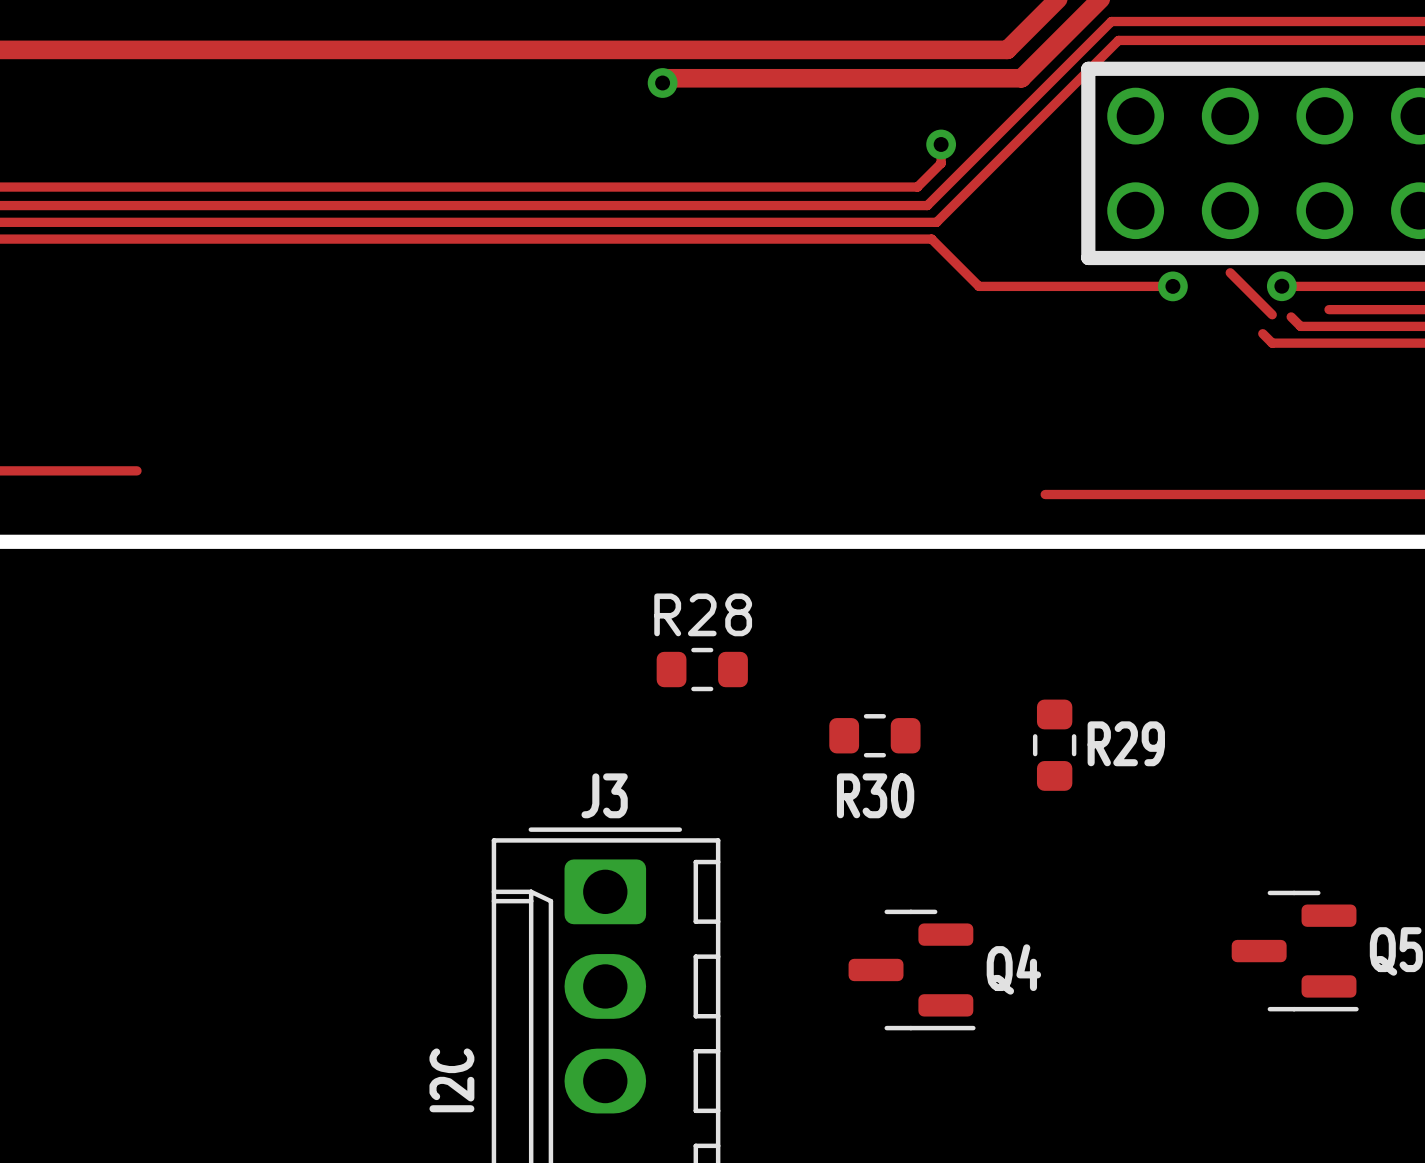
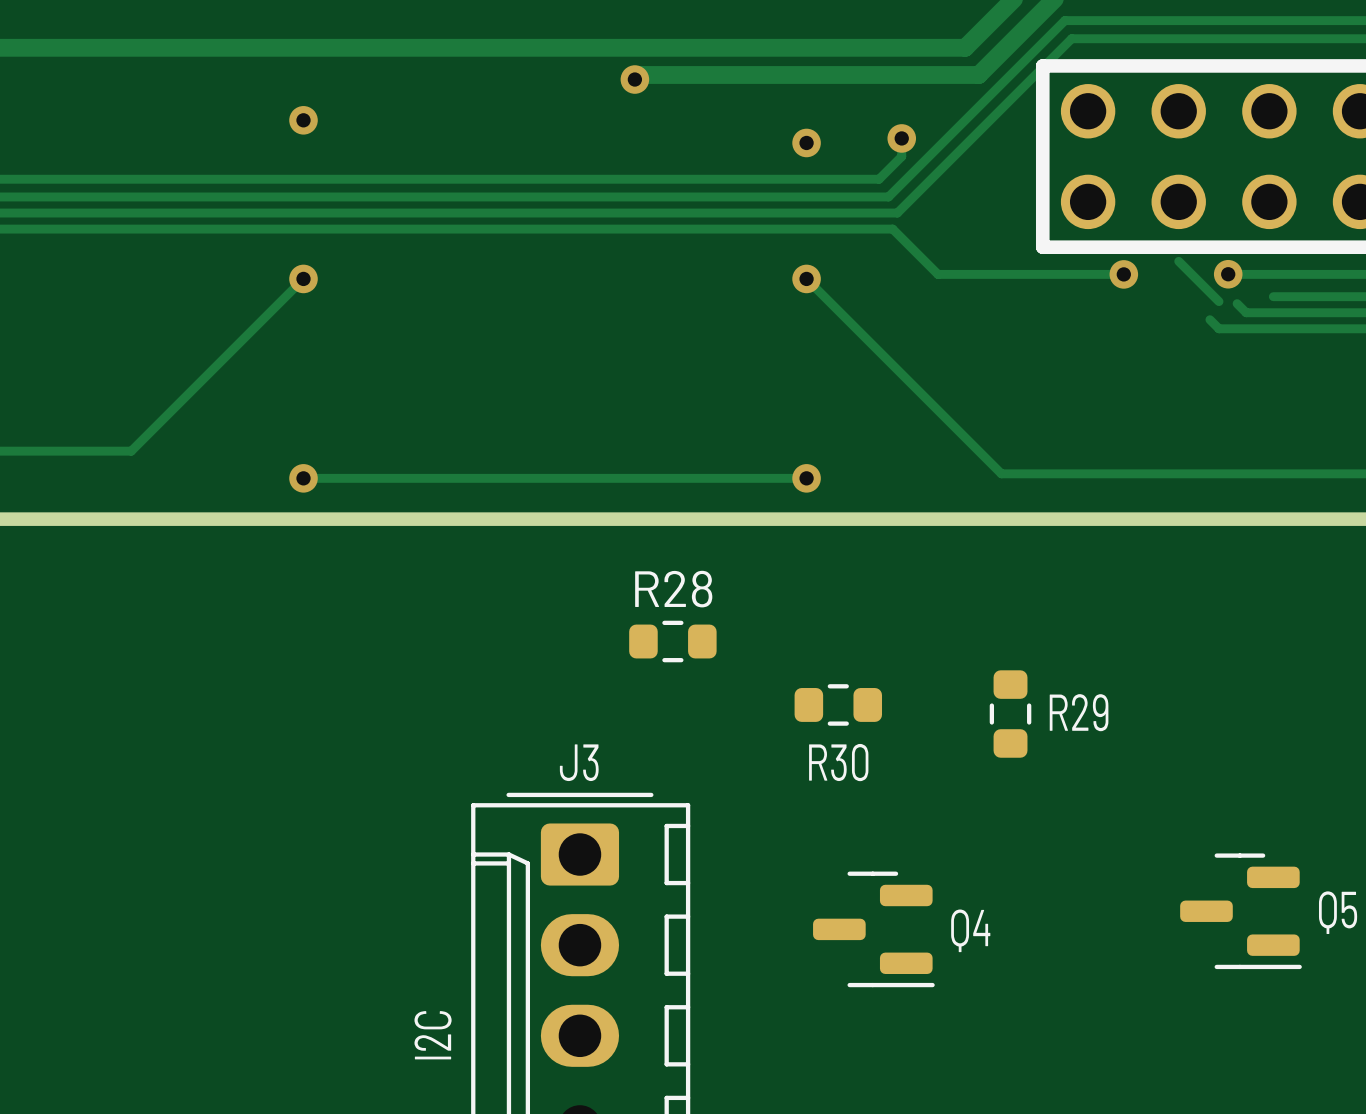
via: none -> (303, 120)
via: none -> (806, 142)
track: none -> (303, 278) (131, 451)
via: none -> (303, 278)
track: none -> (806, 278) (1001, 473)
via: none -> (806, 278)
track: none -> (303, 478) (806, 478)
via: none -> (303, 478)
via: none -> (806, 478)

